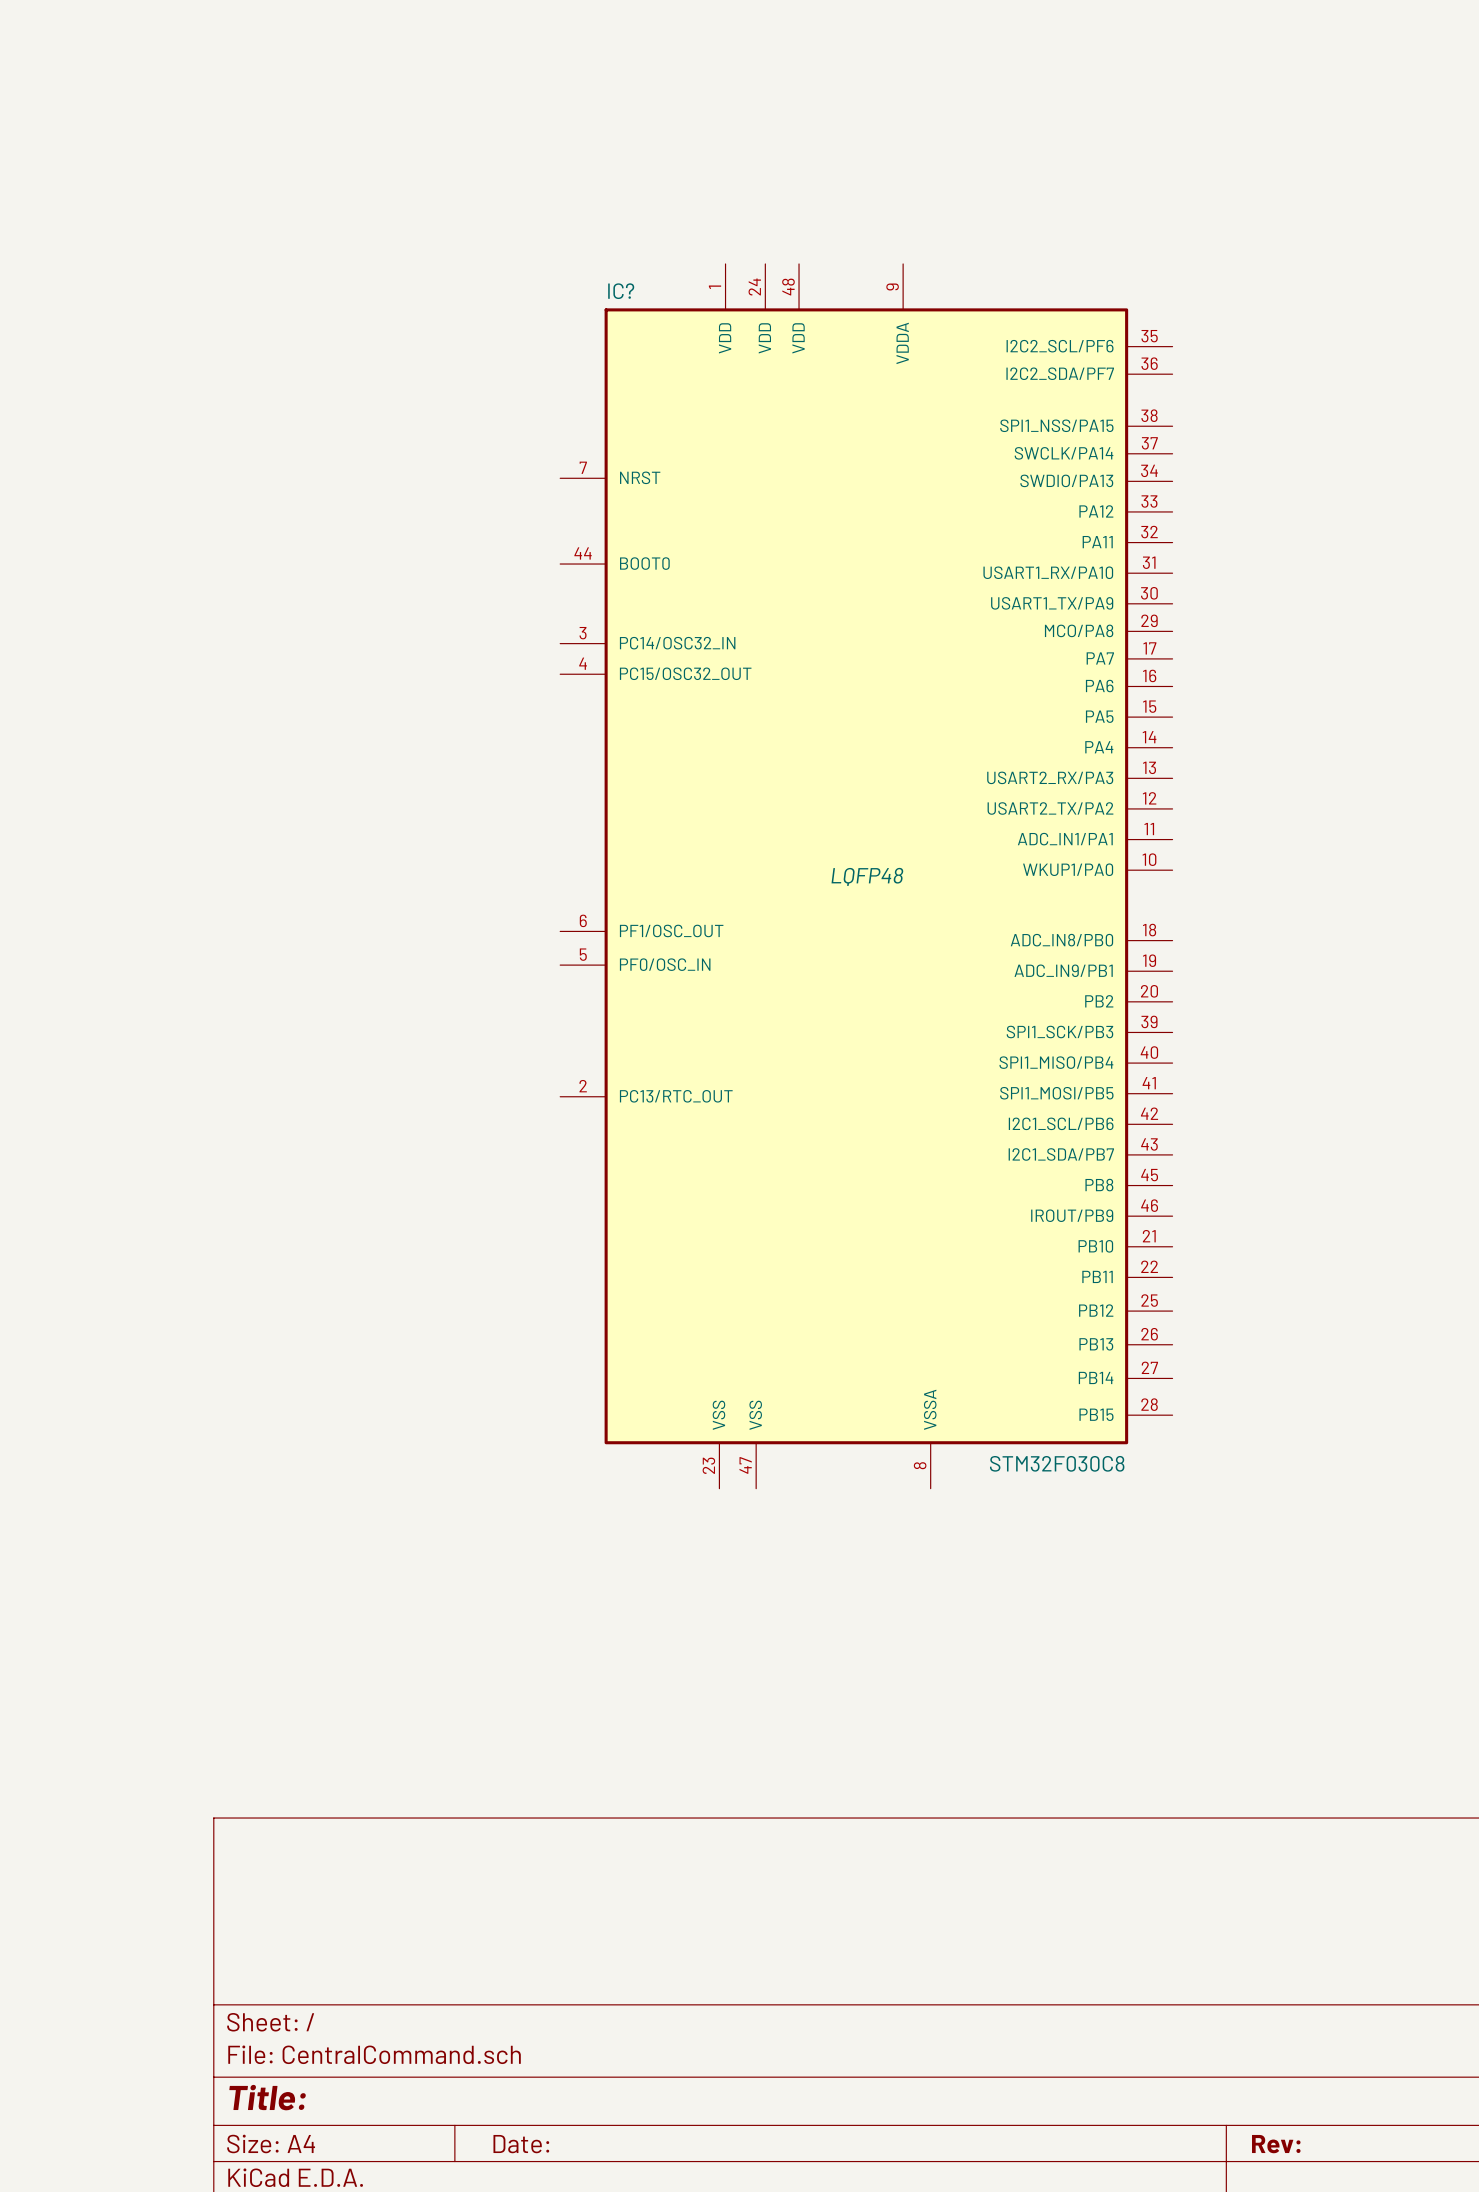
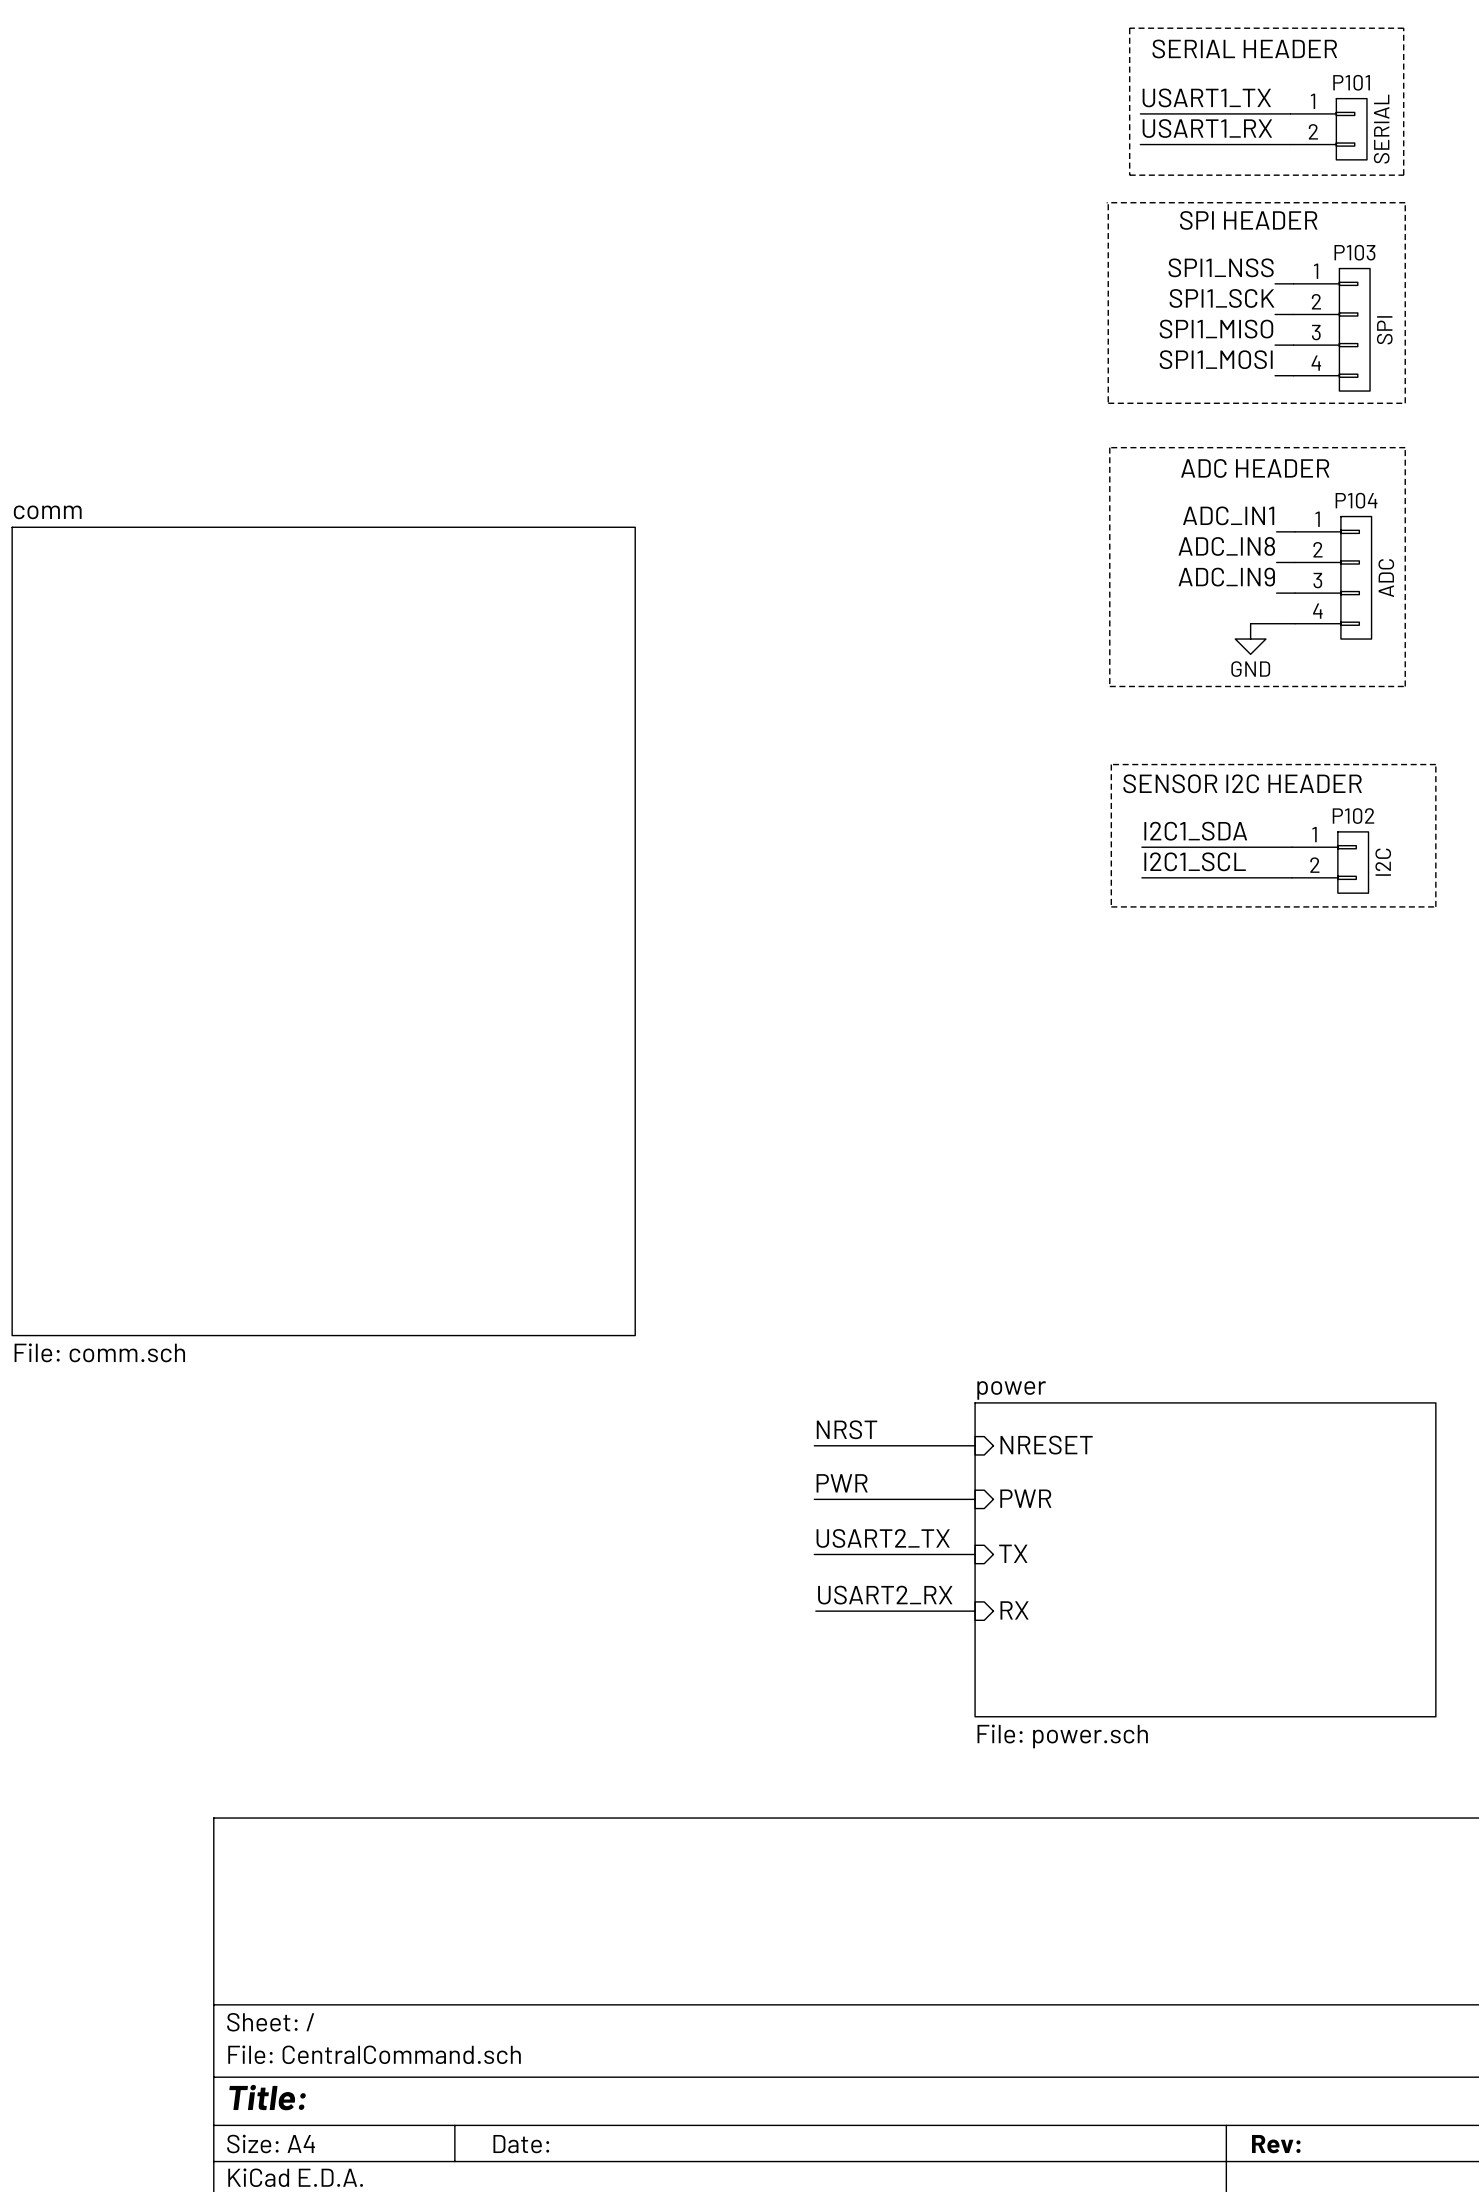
line: none -> (1129, 28) (1129, 175) (1403, 175) (1403, 28) (1129, 28)
text: none -> SERIAL HEADER (1244, 48)
label: none -> USART1_TX (1206, 97)
wire: none -> (1140, 113) (1290, 113)
label: none -> USART1_RX (1207, 128)
P101: none -> SERIAL (1328, 129)
wire: none -> (1140, 144) (1290, 144)
line: none -> (1106, 202) (1405, 202) (1405, 403) (1108, 403) (1108, 204)
text: none -> SPI HEADER (1248, 220)
label: none -> SPI1_NSS (1221, 267)
wire: none -> (1275, 283) (1293, 283)
label: none -> SPI1_SCK (1222, 298)
wire: none -> (1275, 314) (1293, 314)
label: none -> SPI1_MISO (1216, 329)
P103: none -> SPI (1331, 329)
wire: none -> (1275, 345) (1293, 345)
label: none -> SPI1_MOSI (1216, 359)
wire: none -> (1275, 375) (1293, 375)
line: none -> (1109, 447) (1109, 686) (1405, 686) (1405, 447) (1109, 447)
text: none -> ADC HEADER (1255, 468)
label: none -> ADC_IN1 (1228, 515)
wire: none -> (1276, 531) (1295, 531)
label: none -> ADC_IN8 (1226, 546)
wire: none -> (1276, 562) (1295, 562)
label: none -> ADC_IN9 (1226, 577)
P104: none -> ADC (1333, 577)
wire: none -> (1276, 593) (1295, 593)
wire: none -> (1250, 623) (1295, 623)
power symbol: none -> GND (1250, 639)
line: none -> (1109, 764) (1435, 764) (1435, 906) (1111, 906) (1111, 764)
text: none -> SENSOR I2C HEADER (1242, 783)
label: none -> I2C1_SDA (1195, 831)
wire: none -> (1141, 847) (1291, 847)
label: none -> I2C1_SCL (1195, 861)
P102: none -> I2C (1330, 862)
IC?: STM32F030C8 (866, 876) -> none
wire: none -> (1141, 877) (1291, 877)
sheet comm: none -> File: comm.sch (323, 931)
label: none -> NRST (847, 1429)
wire: none -> (814, 1445) (975, 1445)
sheet pin: none -> NRESET (1046, 1445)
label: none -> PWR (842, 1483)
sheet pin: none -> PWR (1025, 1498)
wire: none -> (814, 1499) (975, 1499)
label: none -> USART2_TX (883, 1538)
sheet pin: none -> TX (1013, 1553)
wire: none -> (814, 1554) (975, 1554)
sheet power: none -> File: power.sch (1205, 1559)
label: none -> USART2_RX (885, 1595)
sheet pin: none -> RX (1014, 1610)
wire: none -> (815, 1611) (975, 1611)

